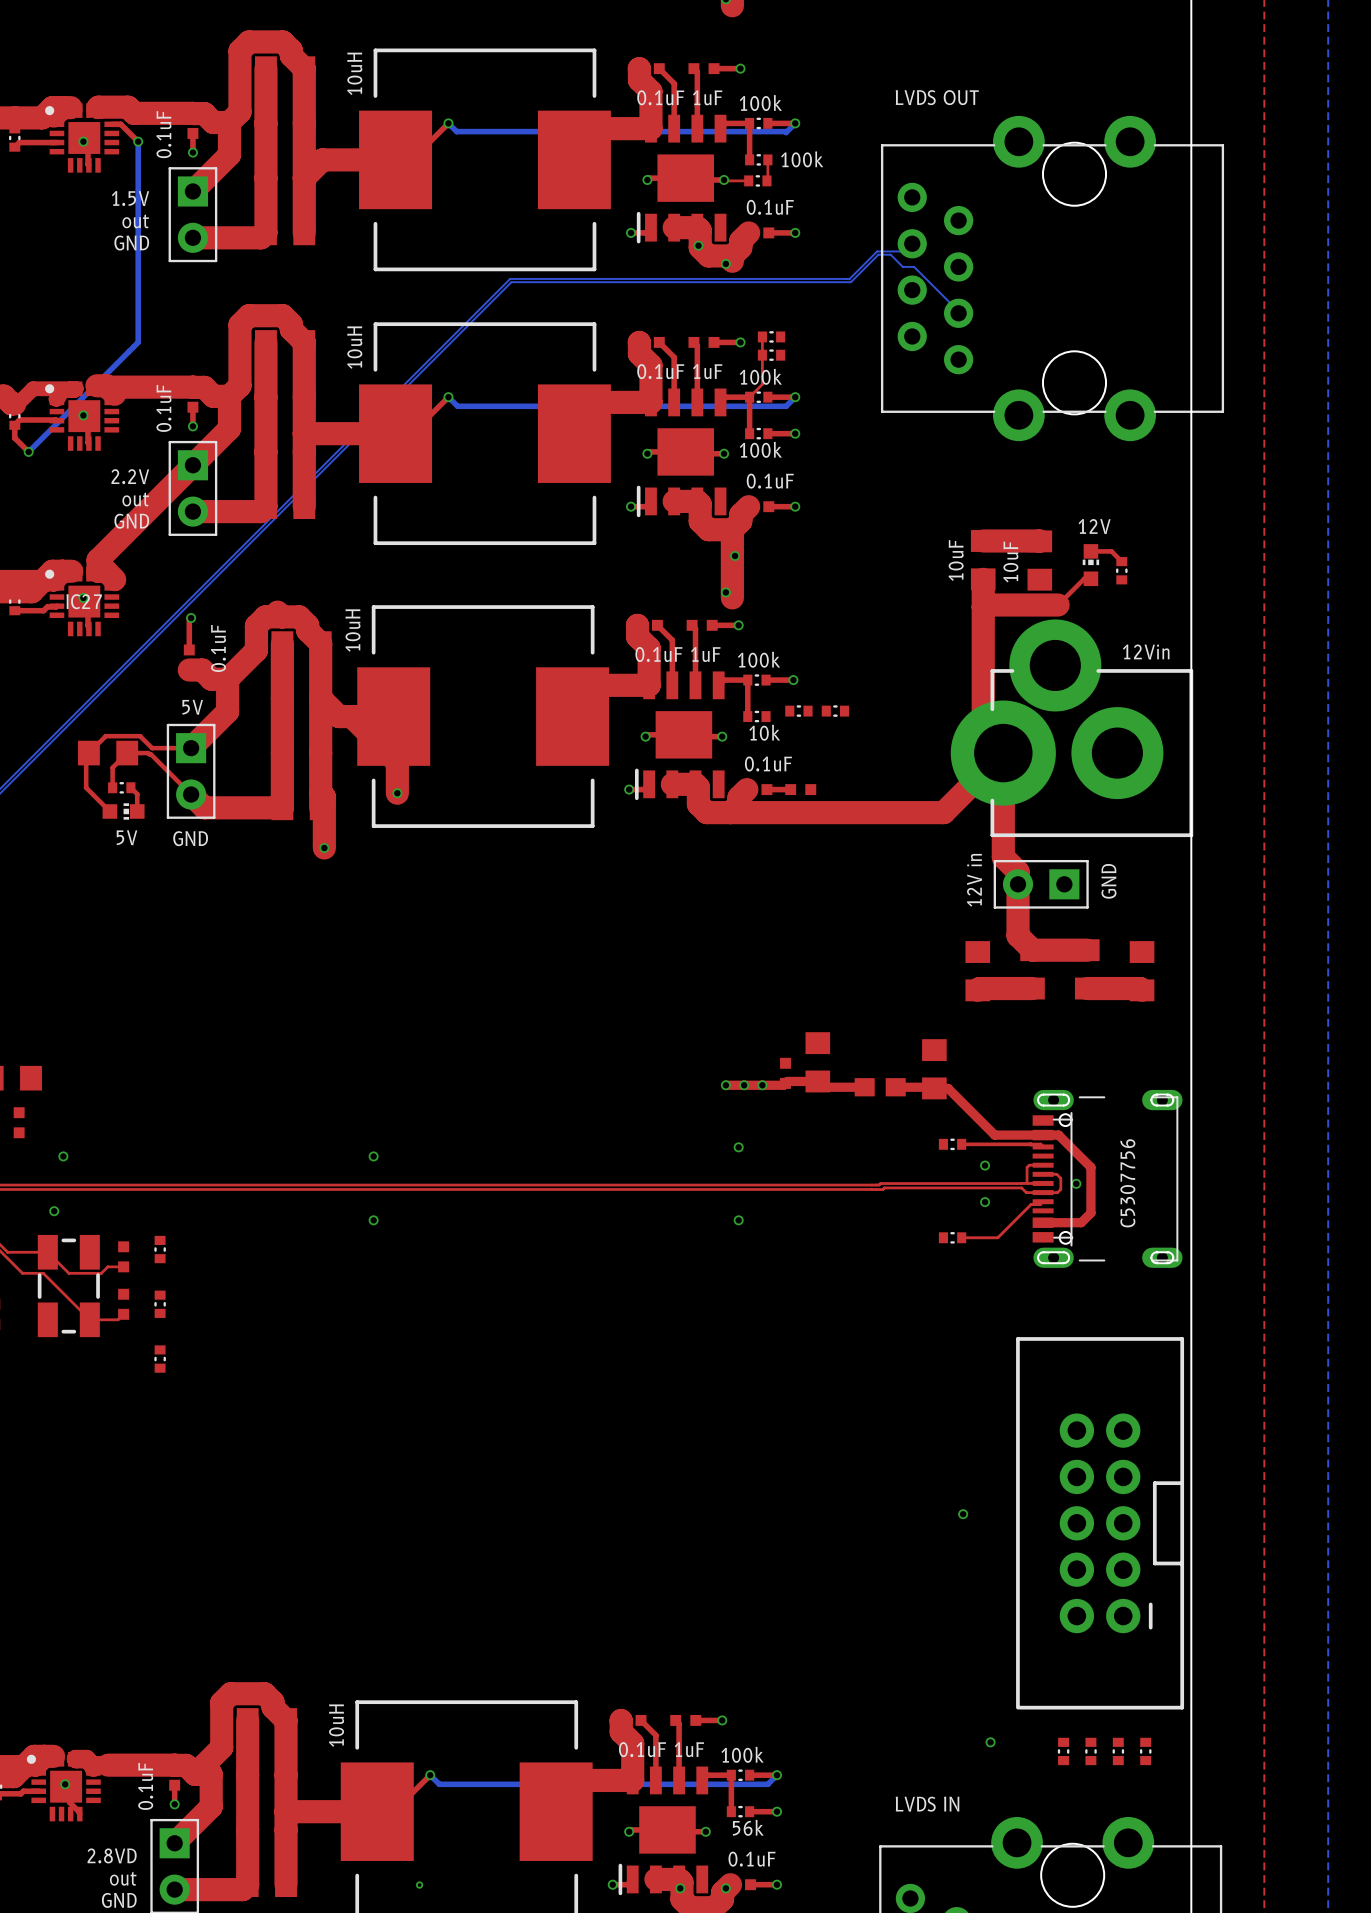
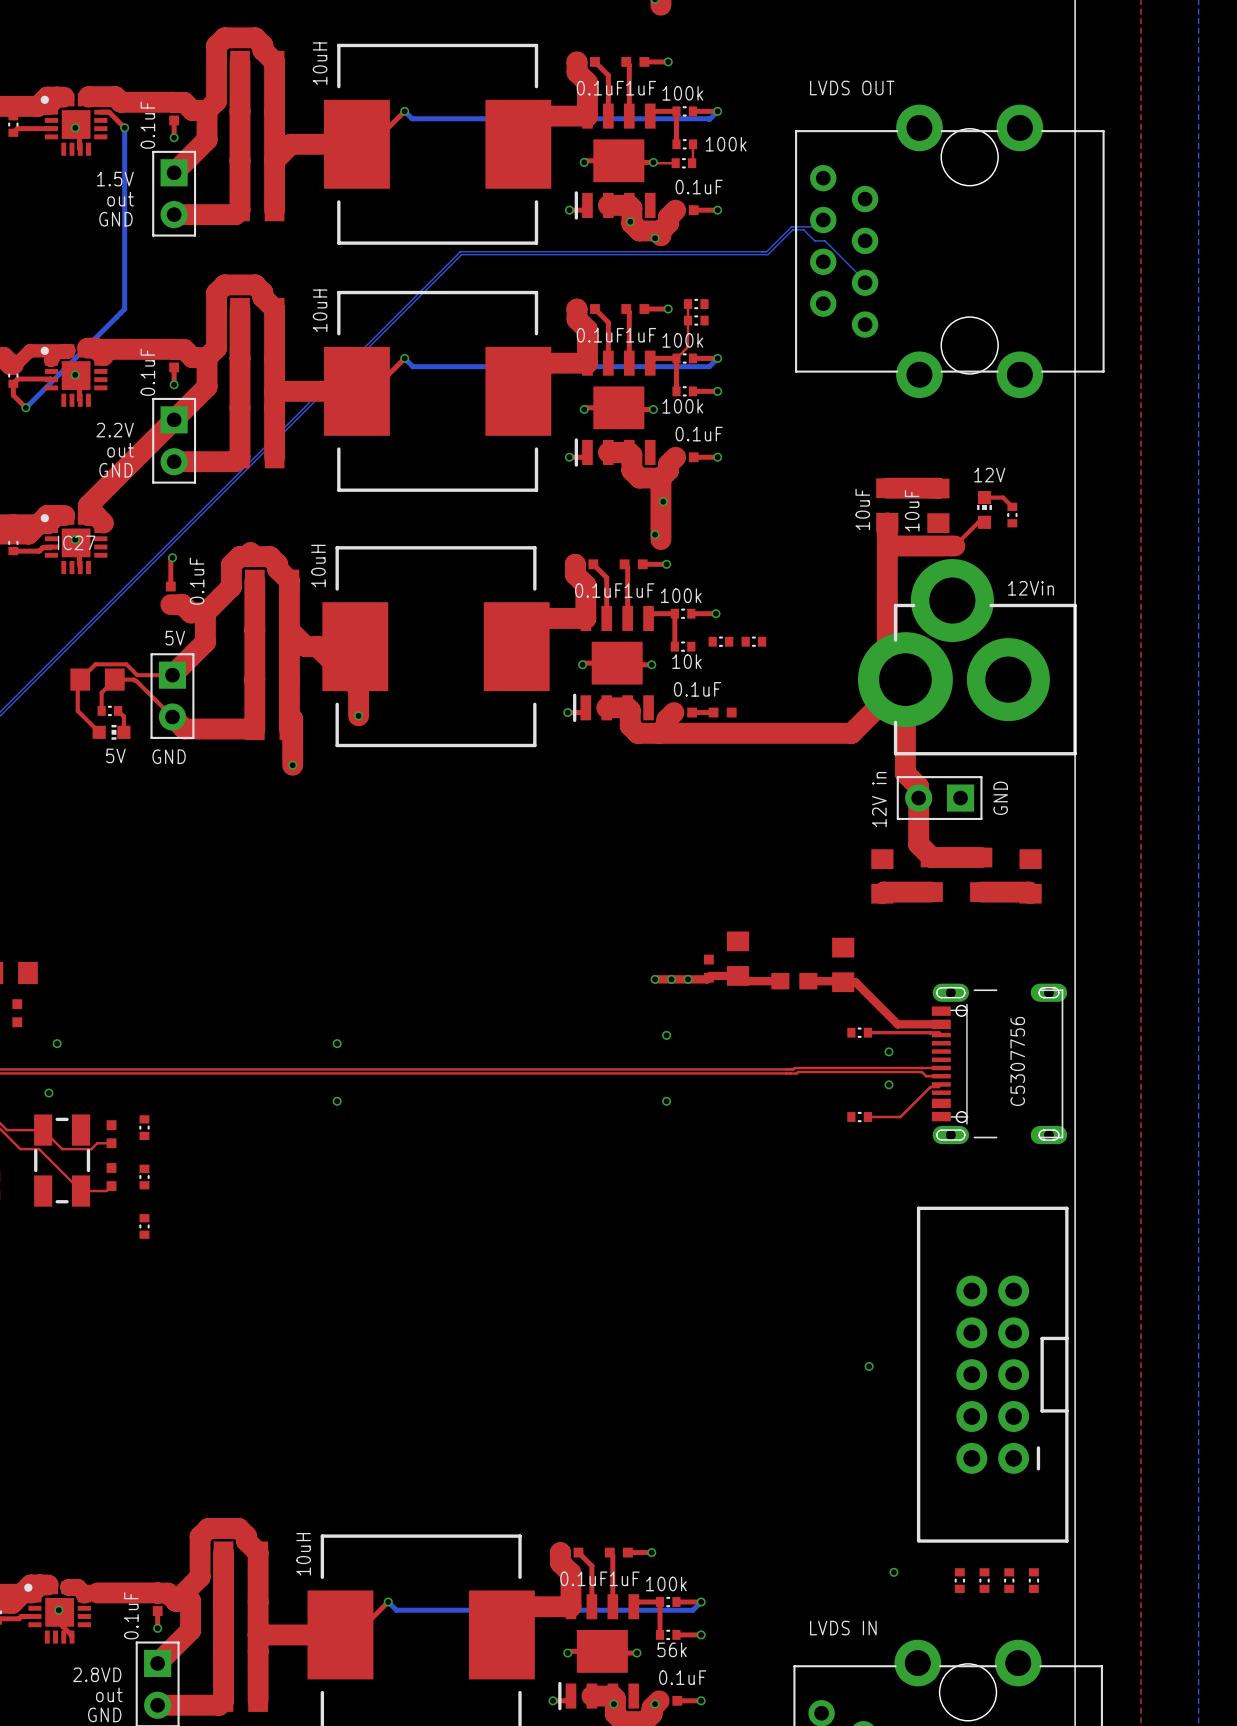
top track: (1043, 1135) (1058, 1135) (1090, 1167) (1090, 1213) (1081, 1222) (1043, 1222) -> none
top track: (1043, 1165) (1029, 1165) (1027, 1167) (1027, 1183) -> none
top track: (1043, 1174) (1056, 1174) (1060, 1178) (1060, 1189) (1057, 1192) (1043, 1192) -> none
via: (1076, 1183) -> none
via: (419, 1885) -> none

